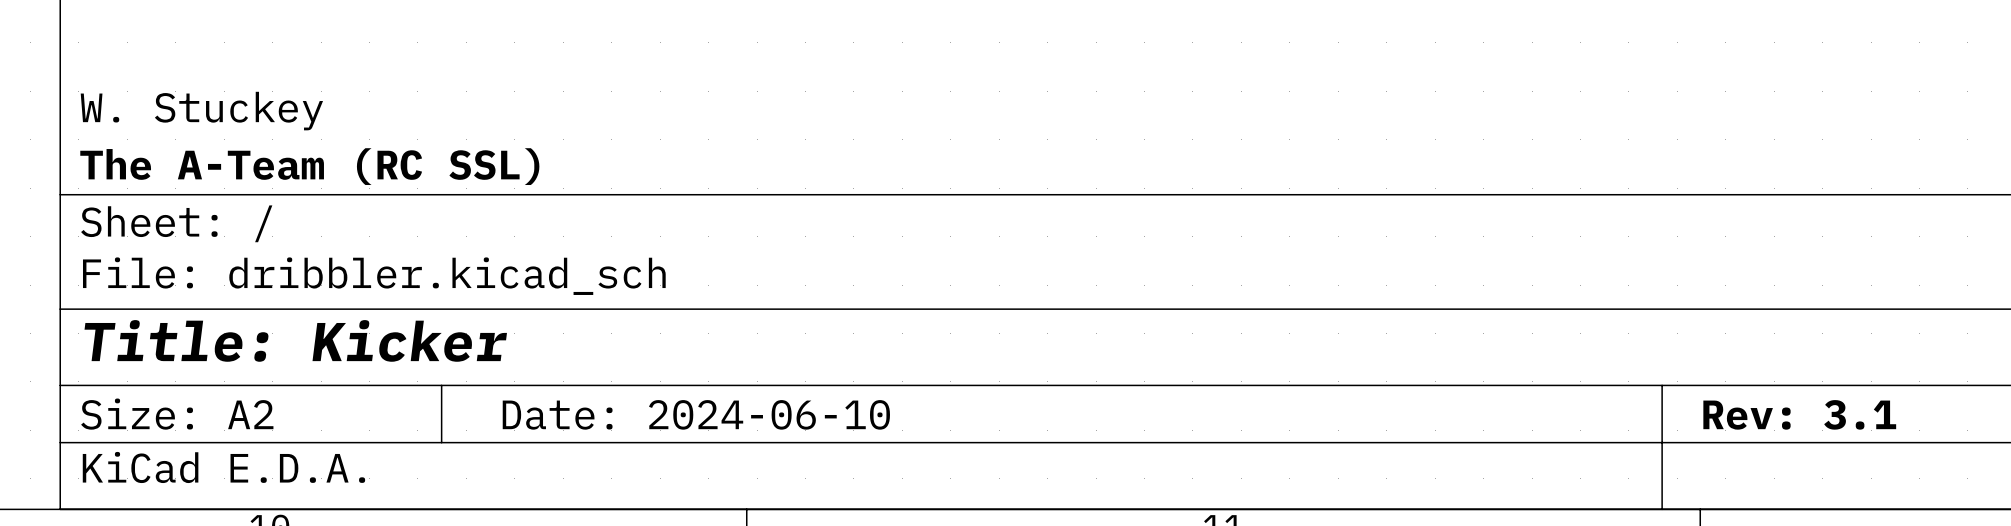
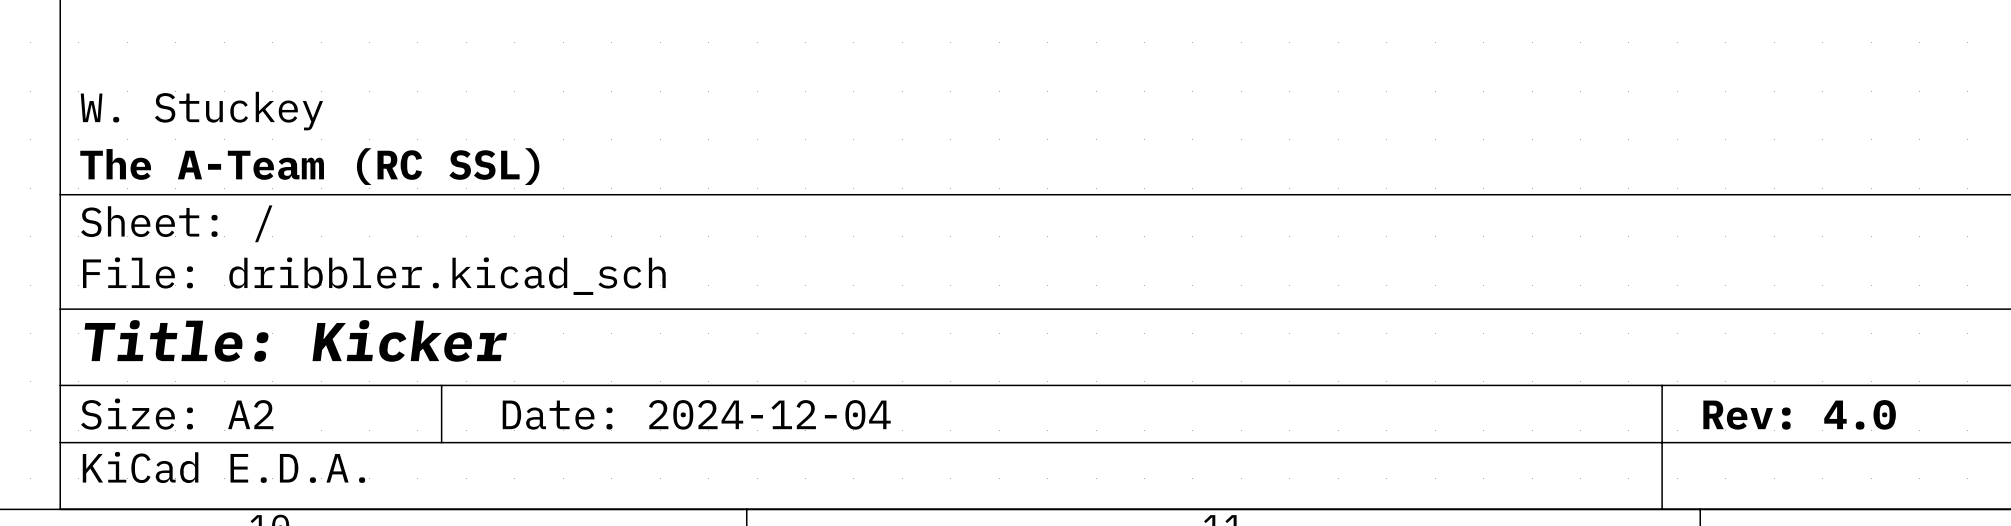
title block: Date: 2024-06-10 (696, 414) -> Date: 2024-12-04 (696, 414)
title block: Rev: 3.1 (1799, 414) -> Rev: 4.0 (1799, 414)

